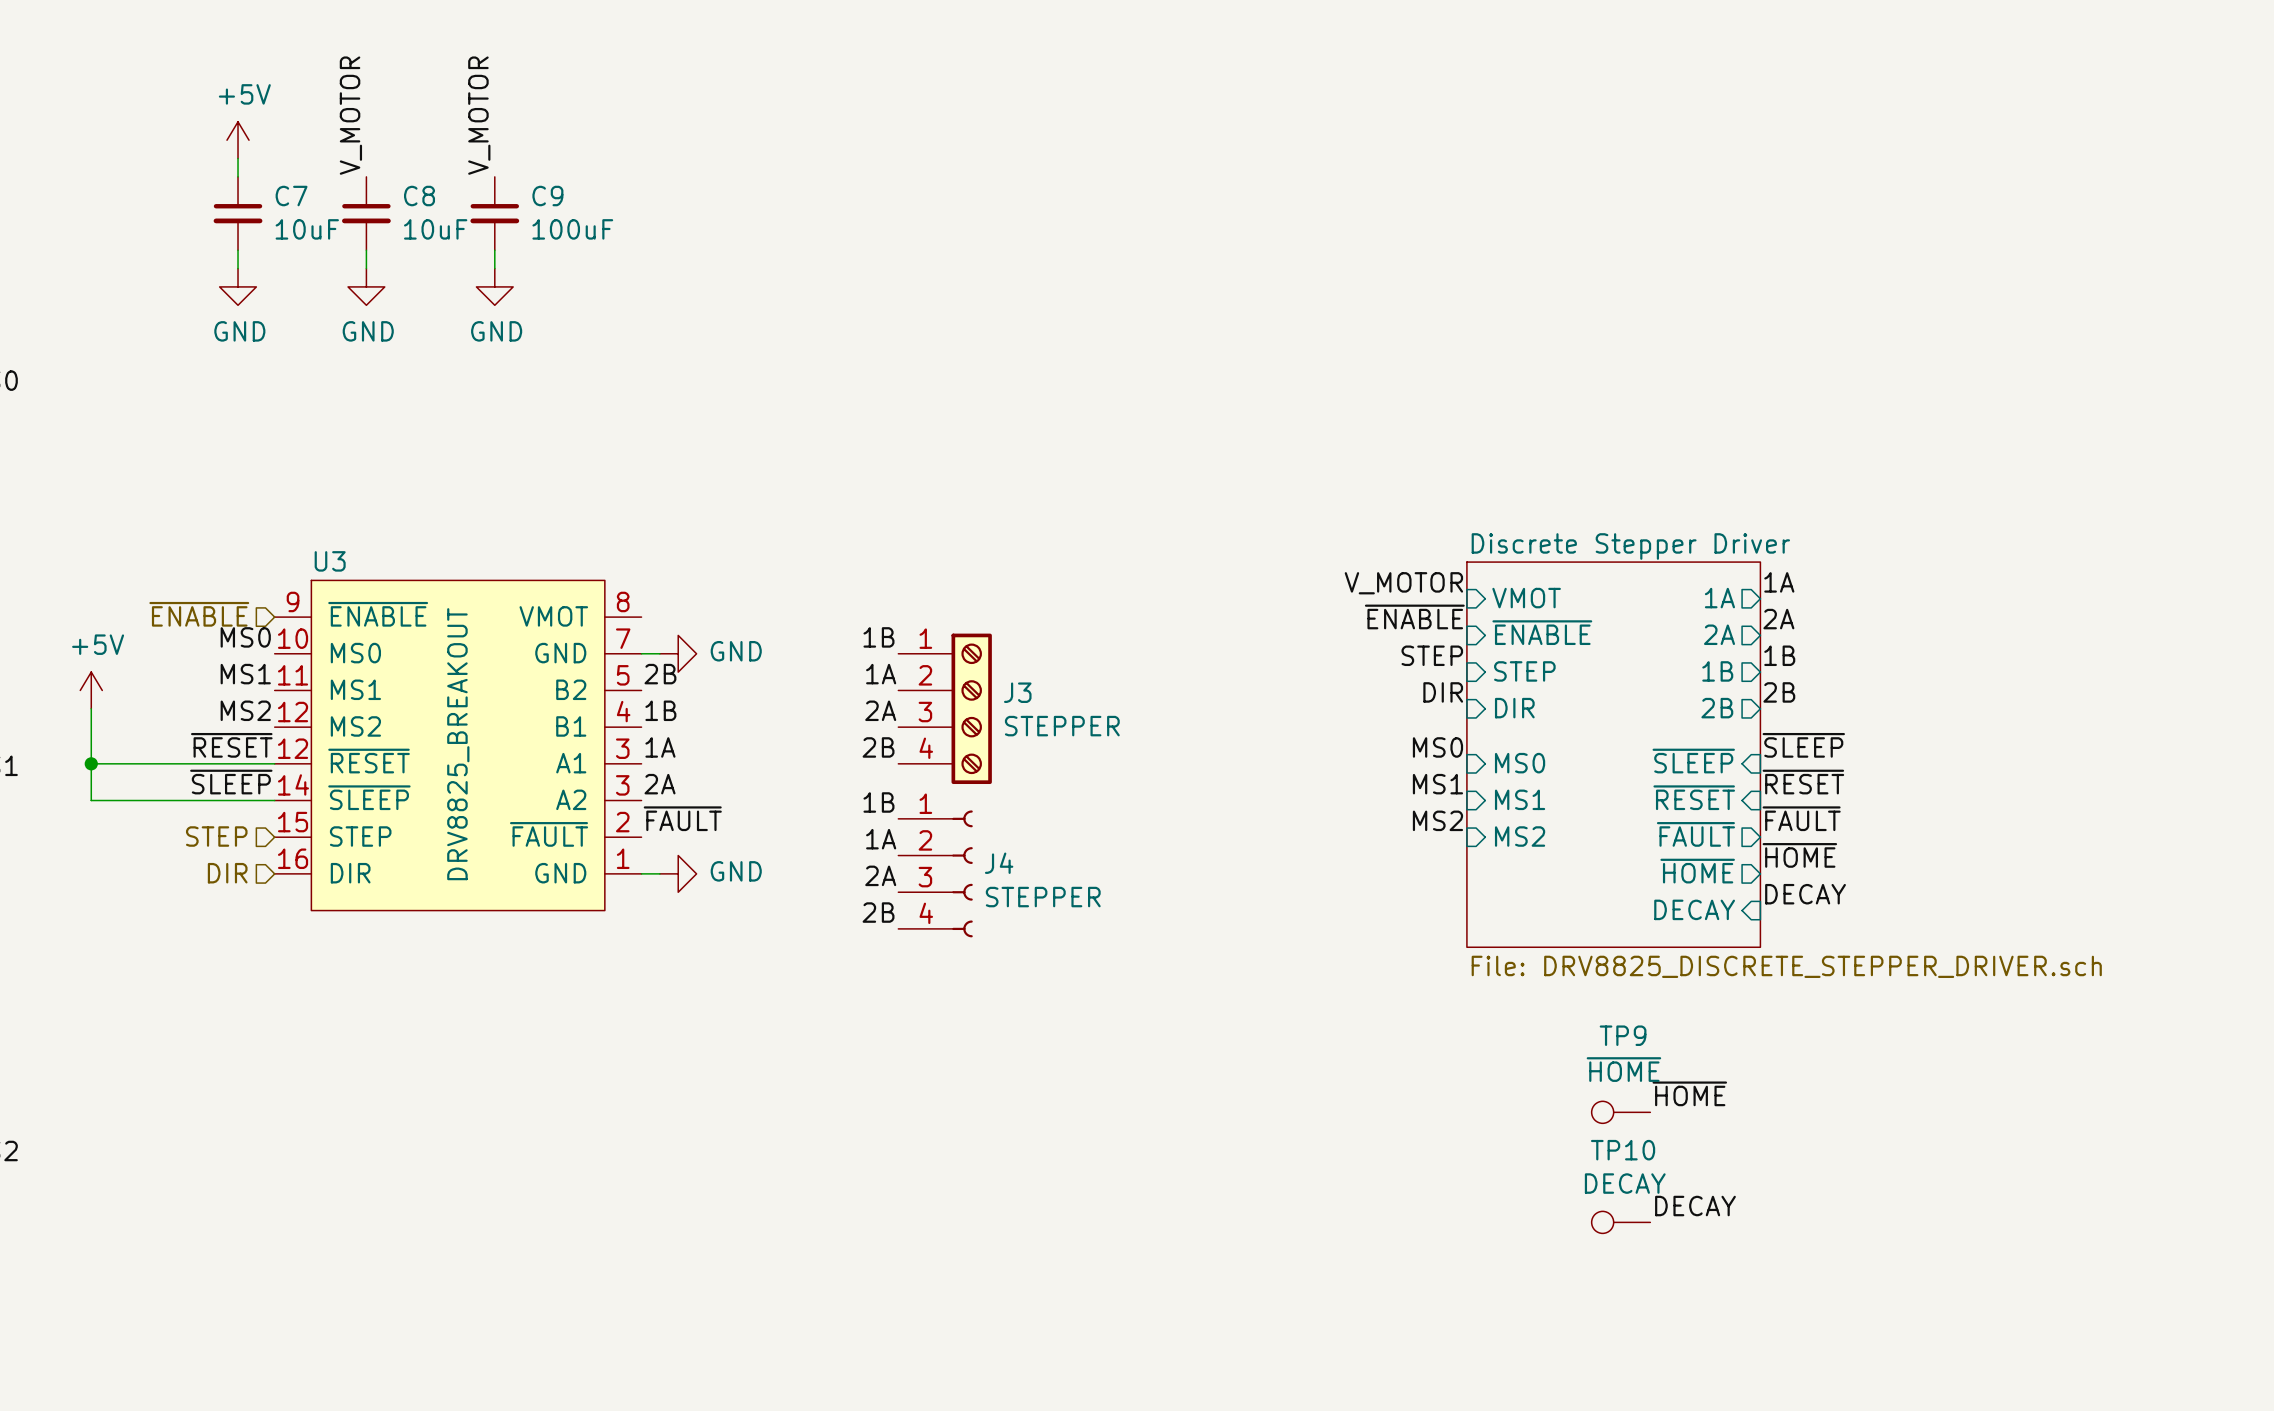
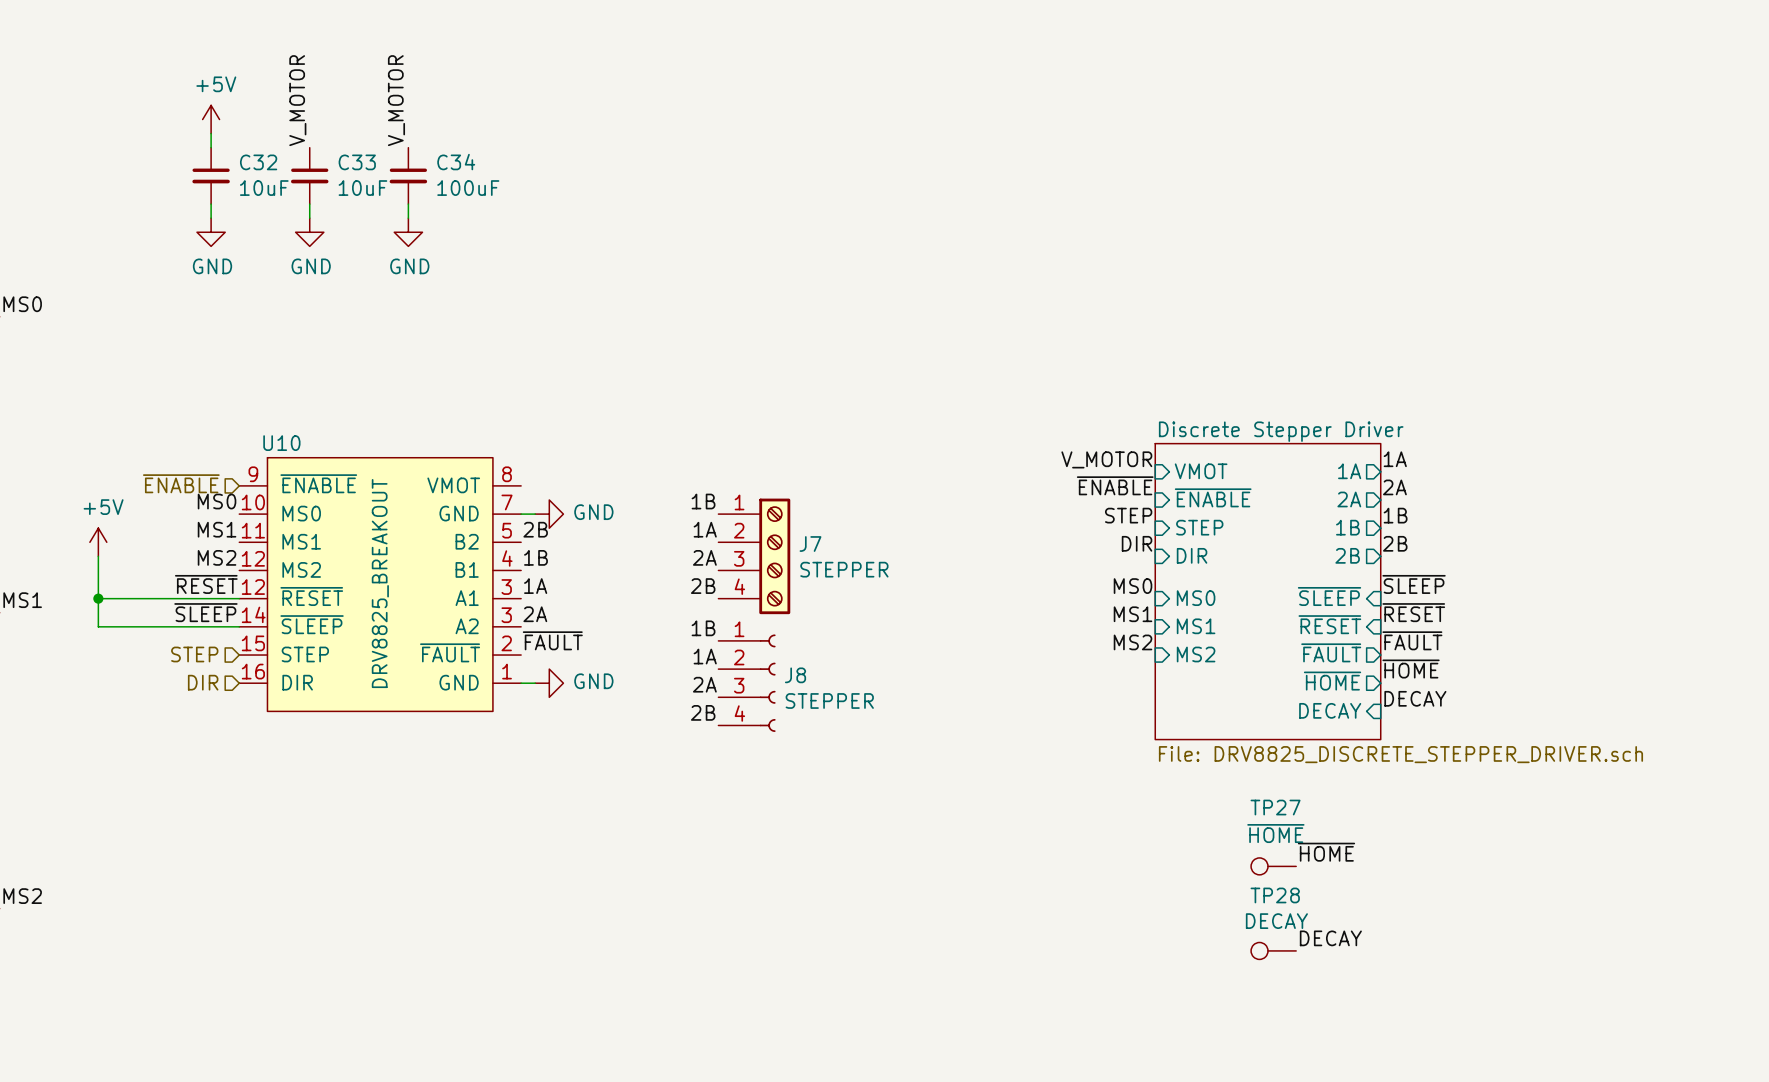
C7 name: C7 (291, 196) -> C32 (258, 162)
C8 name: C8 (419, 196) -> C33 (357, 162)
C9 name: C9 (547, 196) -> C34 (456, 162)
U3 name: U3 (330, 561) -> U10 (281, 443)
J3 name: J3 (1017, 692) -> J7 (810, 544)
J4 name: J4 (999, 863) -> J8 (795, 675)
TP9 name: TP9 (1623, 1035) -> TP27 (1275, 807)
TP10 name: TP10 (1623, 1150) -> TP28 (1275, 895)

